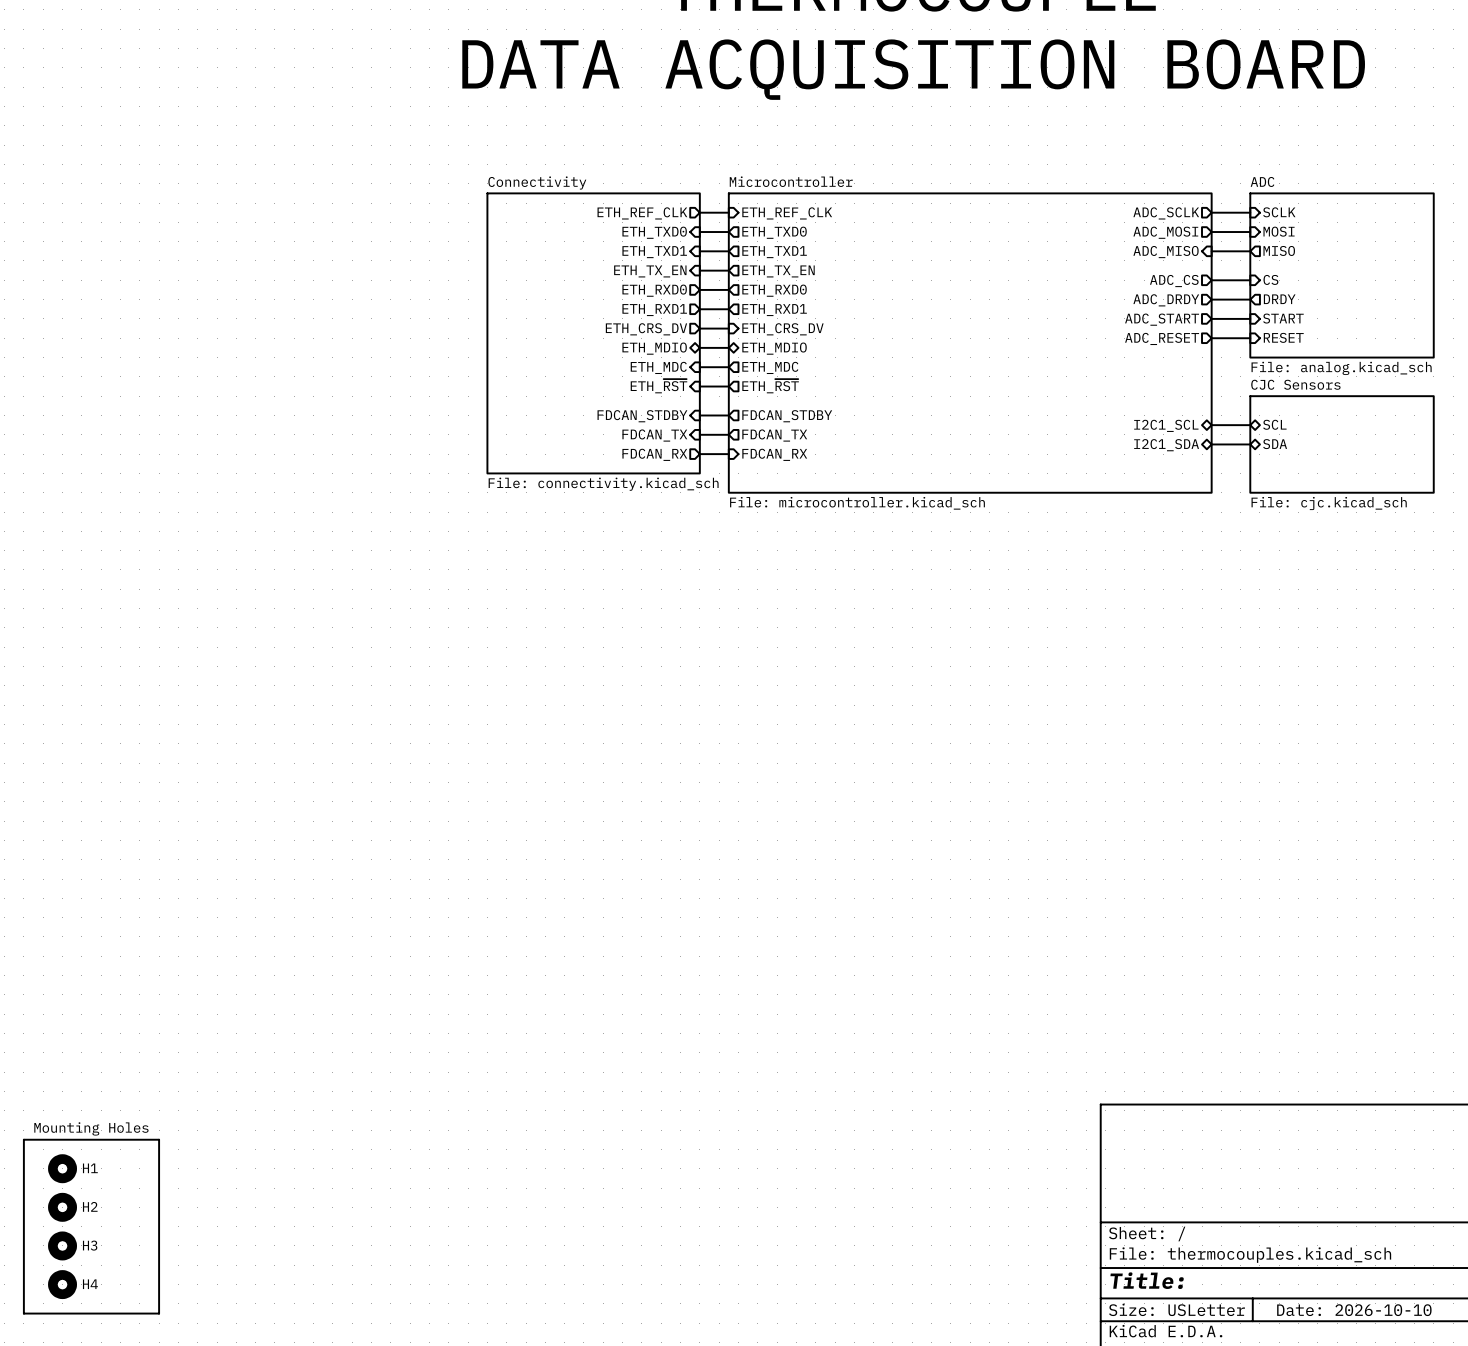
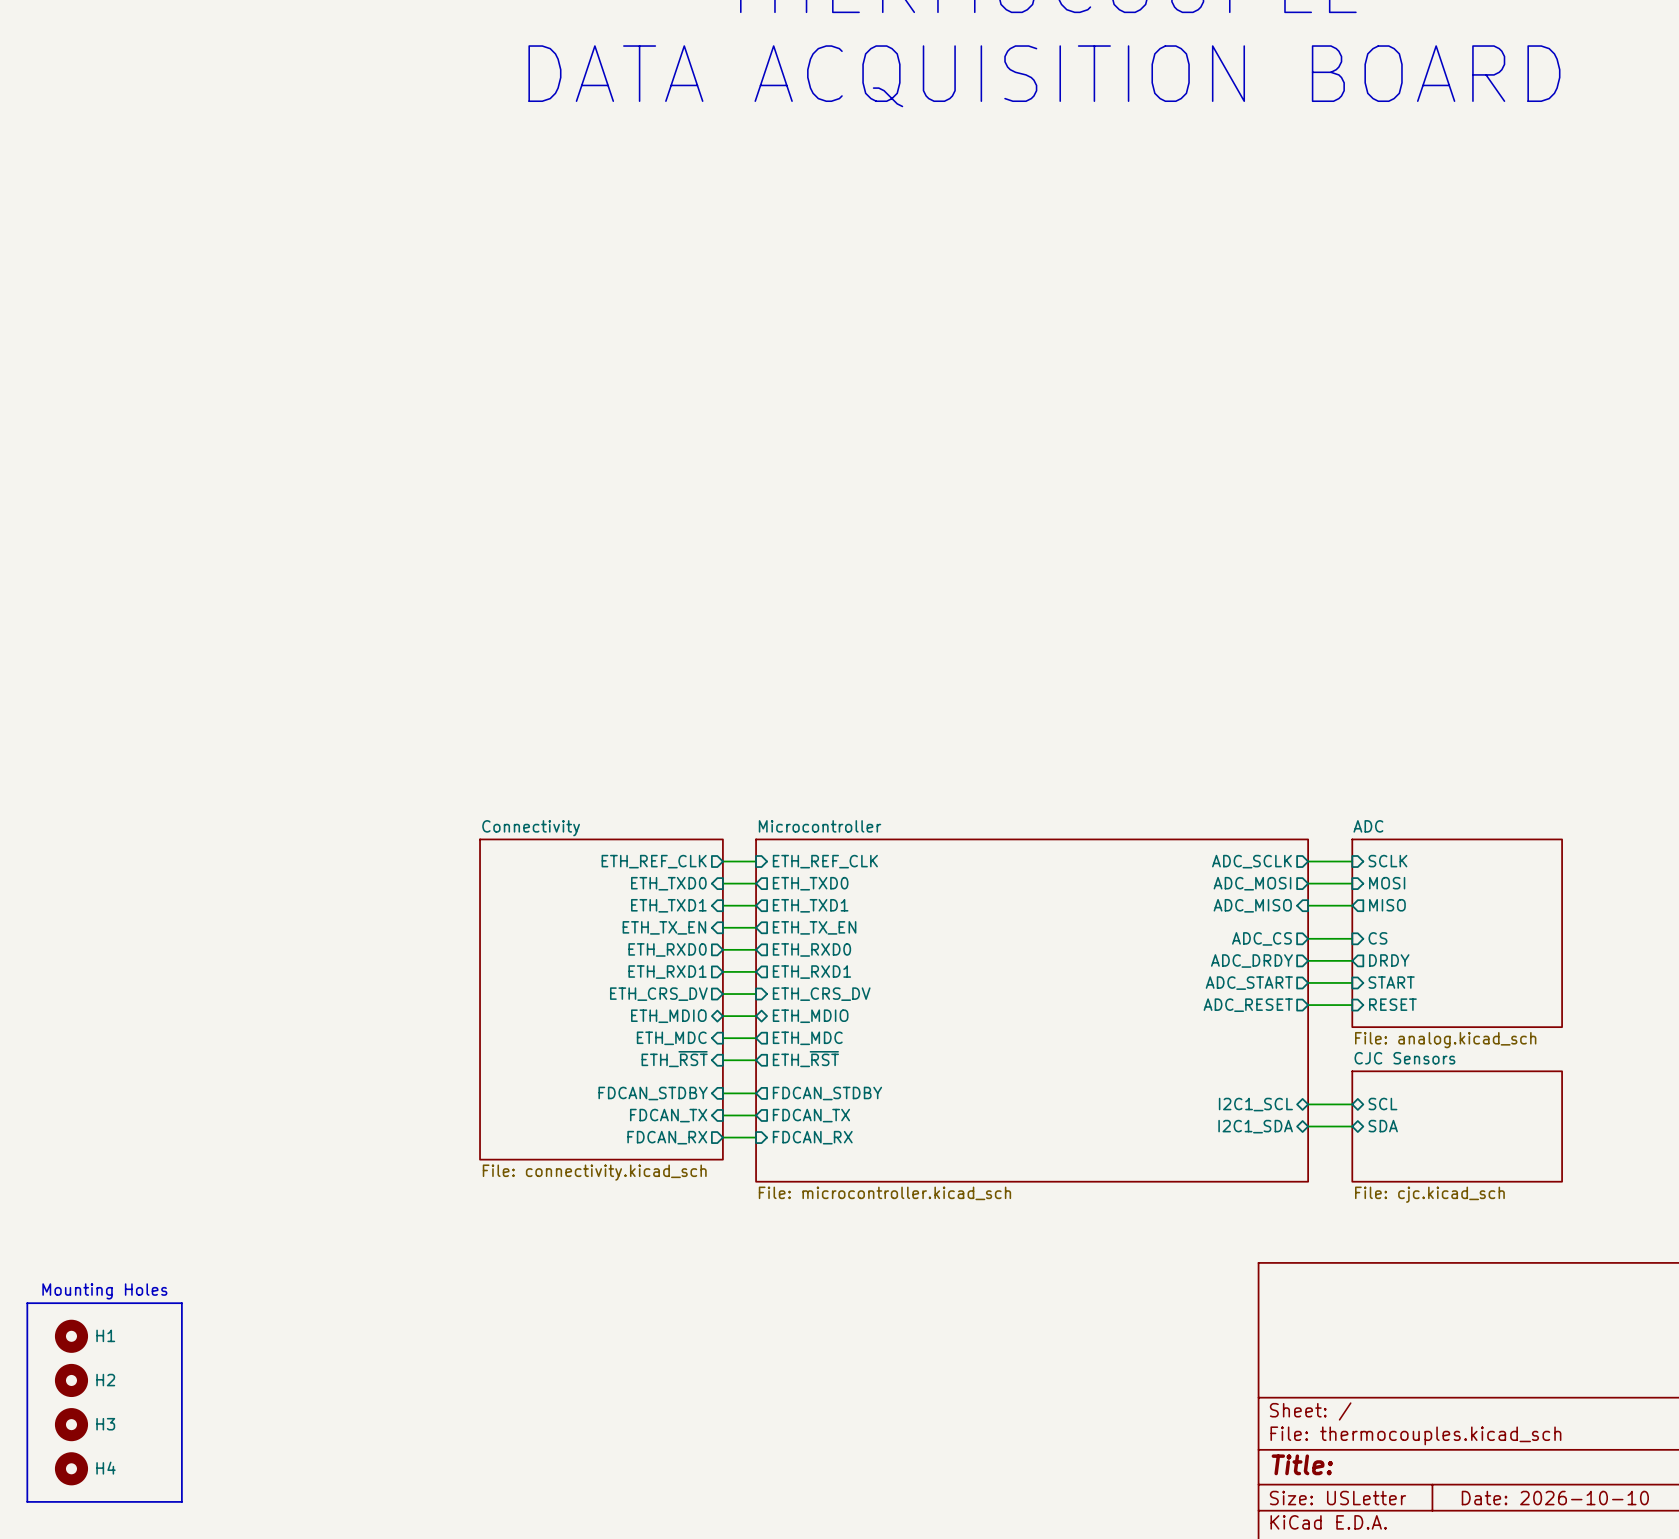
wire: (699, 212) (728, 212) -> none
wire: (1211, 212) (1250, 212) -> none
sheet pin: SCLK (1279, 212) -> none
sheet pin: ETH_REF_CLK (642, 213) -> none
sheet pin: ETH_REF_CLK (787, 213) -> none
sheet pin: ADC_SCLK (1166, 213) -> none
sheet pin: MOSI (1279, 231) -> none
sheet pin: ETH_TXD0 (654, 232) -> none
wire: (699, 232) (728, 232) -> none
sheet pin: ETH_TXD0 (774, 232) -> none
sheet pin: ADC_MOSI (1165, 232) -> none
wire: (1211, 232) (1250, 232) -> none
sheet pin: MISO (1279, 250) -> none
wire: (699, 251) (728, 251) -> none
wire: (1211, 251) (1250, 251) -> none
sheet pin: ETH_TXD1 (654, 252) -> none
sheet pin: ETH_TXD1 (774, 252) -> none
sheet pin: ADC_MISO (1166, 252) -> none
wire: (699, 270) (728, 270) -> none
sheet pin: ETH_TX_EN (650, 271) -> none
sheet pin: ETH_TX_EN (778, 271) -> none
sheet ADC: File: analog.kicad_sch (1342, 275) -> none
sheet pin: CS (1270, 279) -> none
wire: (1211, 280) (1250, 280) -> none
sheet pin: ADC_CS (1174, 281) -> none
wire: (699, 289) (728, 289) -> none
sheet pin: ETH_RXD0 (654, 290) -> none
sheet pin: ETH_RXD0 (774, 290) -> none
wire: (1211, 299) (1250, 299) -> none
sheet pin: DRDY (1279, 299) -> none
sheet pin: ADC_DRDY (1166, 300) -> none
wire: (699, 309) (728, 309) -> none
sheet pin: ETH_RXD1 (654, 310) -> none
sheet pin: ETH_RXD1 (774, 310) -> none
wire: (1211, 318) (1250, 318) -> none
sheet pin: START (1283, 318) -> none
sheet pin: ADC_START (1162, 319) -> none
wire: (699, 328) (728, 328) -> none
sheet pin: ETH_CRS_DV (646, 329) -> none
sheet pin: ETH_CRS_DV (782, 329) -> none
sheet Connectivity: File: connectivity.kicad_sch (593, 333) -> none
sheet pin: RESET (1283, 337) -> none
sheet pin: ADC_RESET (1162, 338) -> none
wire: (1211, 338) (1250, 338) -> none
sheet Microcontroller: File: microcontroller.kicad_sch (970, 343) -> none
wire: (699, 347) (728, 347) -> none
sheet pin: ETH_MDIO (654, 348) -> none
sheet pin: ETH_MDIO (774, 348) -> none
sheet pin: ETH_MDC (658, 367) -> none
wire: (699, 367) (728, 367) -> none
sheet pin: ETH_MDC (770, 367) -> none
sheet pin: ETH_~{RST} (658, 386) -> none
wire: (699, 386) (728, 386) -> none
sheet pin: ETH_~{RST} (770, 386) -> none
wire: (699, 415) (728, 415) -> none
sheet pin: FDCAN_STDBY (642, 416) -> none
sheet pin: FDCAN_STDBY (787, 416) -> none
sheet pin: SCL (1274, 424) -> none
sheet pin: I2C1_SCL (1166, 425) -> none
wire: (1211, 425) (1250, 425) -> none
wire: (699, 434) (728, 434) -> none
sheet pin: FDCAN_TX (654, 435) -> none
sheet pin: FDCAN_TX (774, 435) -> none
wire: (1211, 444) (1250, 444) -> none
sheet pin: SDA (1275, 444) -> none
sheet CJC Sensors: File: cjc.kicad_sch (1342, 444) -> none
sheet pin: I2C1_SDA (1166, 445) -> none
sheet pin: FDCAN_RX (654, 454) -> none
wire: (699, 454) (728, 454) -> none
sheet pin: FDCAN_RX (774, 454) -> none
wire: none -> (722, 861) (756, 861)
wire: none -> (1308, 861) (1352, 861)
sheet pin: none -> SCLK (1387, 861)
sheet pin: none -> ETH_REF_CLK (654, 861)
sheet pin: none -> ETH_REF_CLK (825, 861)
sheet pin: none -> ADC_SCLK (1251, 861)
wire: none -> (722, 883) (756, 883)
wire: none -> (1308, 883) (1352, 883)
sheet pin: none -> MOSI (1387, 883)
sheet pin: none -> ETH_TXD0 (668, 883)
sheet pin: none -> ETH_TXD0 (810, 883)
sheet pin: none -> ADC_MOSI (1252, 883)
sheet pin: none -> MISO (1387, 905)
sheet pin: none -> ETH_TXD1 (668, 905)
wire: none -> (722, 905) (756, 905)
sheet pin: none -> ETH_TXD1 (810, 905)
sheet pin: none -> ADC_MISO (1252, 905)
wire: none -> (1308, 905) (1352, 905)
wire: none -> (722, 927) (756, 927)
sheet pin: none -> ETH_TX_EN (664, 927)
sheet pin: none -> ETH_TX_EN (814, 927)
sheet ADC: none -> File: analog.kicad_sch (1457, 933)
sheet pin: none -> CS (1377, 938)
sheet pin: none -> ADC_CS (1261, 938)
wire: none -> (1308, 938) (1352, 938)
wire: none -> (722, 949) (756, 949)
sheet pin: none -> ETH_RXD0 (667, 949)
sheet pin: none -> ETH_RXD0 (811, 949)
wire: none -> (1308, 960) (1352, 960)
sheet pin: none -> DRDY (1389, 960)
sheet pin: none -> ADC_DRDY (1251, 961)
sheet pin: none -> ETH_RXD1 (667, 972)
wire: none -> (722, 971) (756, 971)
sheet pin: none -> ETH_RXD1 (811, 972)
wire: none -> (1308, 982) (1352, 982)
sheet pin: none -> START (1391, 982)
sheet pin: none -> ADC_START (1249, 983)
wire: none -> (722, 994) (756, 994)
sheet pin: none -> ETH_CRS_DV (658, 994)
sheet pin: none -> ETH_CRS_DV (821, 994)
sheet Connectivity: none -> File: connectivity.kicad_sch (601, 999)
sheet pin: none -> RESET (1392, 1004)
sheet pin: none -> ADC_RESET (1248, 1005)
wire: none -> (1308, 1005) (1352, 1005)
sheet Microcontroller: none -> File: microcontroller.kicad_sch (1032, 1010)
wire: none -> (722, 1016) (756, 1016)
sheet pin: none -> ETH_MDIO (668, 1016)
sheet pin: none -> ETH_MDIO (810, 1016)
wire: none -> (722, 1038) (756, 1038)
sheet pin: none -> ETH_MDC (671, 1038)
sheet pin: none -> ETH_MDC (807, 1038)
sheet pin: none -> ETH_~{RST} (674, 1059)
sheet pin: none -> ETH_~{RST} (805, 1059)
wire: none -> (722, 1060) (756, 1060)
sheet pin: none -> FDCAN_STDBY (653, 1093)
wire: none -> (722, 1093) (756, 1093)
sheet pin: none -> FDCAN_STDBY (827, 1093)
wire: none -> (1308, 1104) (1352, 1104)
sheet pin: none -> SCL (1382, 1104)
sheet pin: none -> I2C1_SCL (1255, 1104)
wire: none -> (722, 1115) (756, 1115)
sheet pin: none -> FDCAN_TX (668, 1115)
sheet pin: none -> FDCAN_TX (811, 1115)
sheet pin: none -> SDA (1383, 1126)
sheet pin: none -> I2C1_SDA (1255, 1126)
wire: none -> (1308, 1126) (1352, 1126)
sheet CJC Sensors: none -> File: cjc.kicad_sch (1457, 1126)
wire: none -> (722, 1137) (756, 1137)
sheet pin: none -> FDCAN_RX (667, 1137)
sheet pin: none -> FDCAN_RX (812, 1137)

